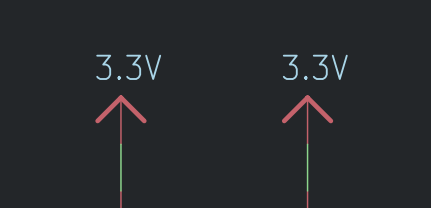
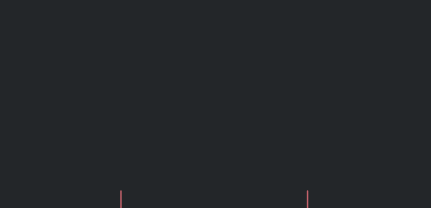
power symbol: 3.3V (120, 119) -> none
power symbol: 3.3V (307, 119) -> none
wire: (120, 144) (120, 190) -> none
wire: (307, 144) (307, 190) -> none

